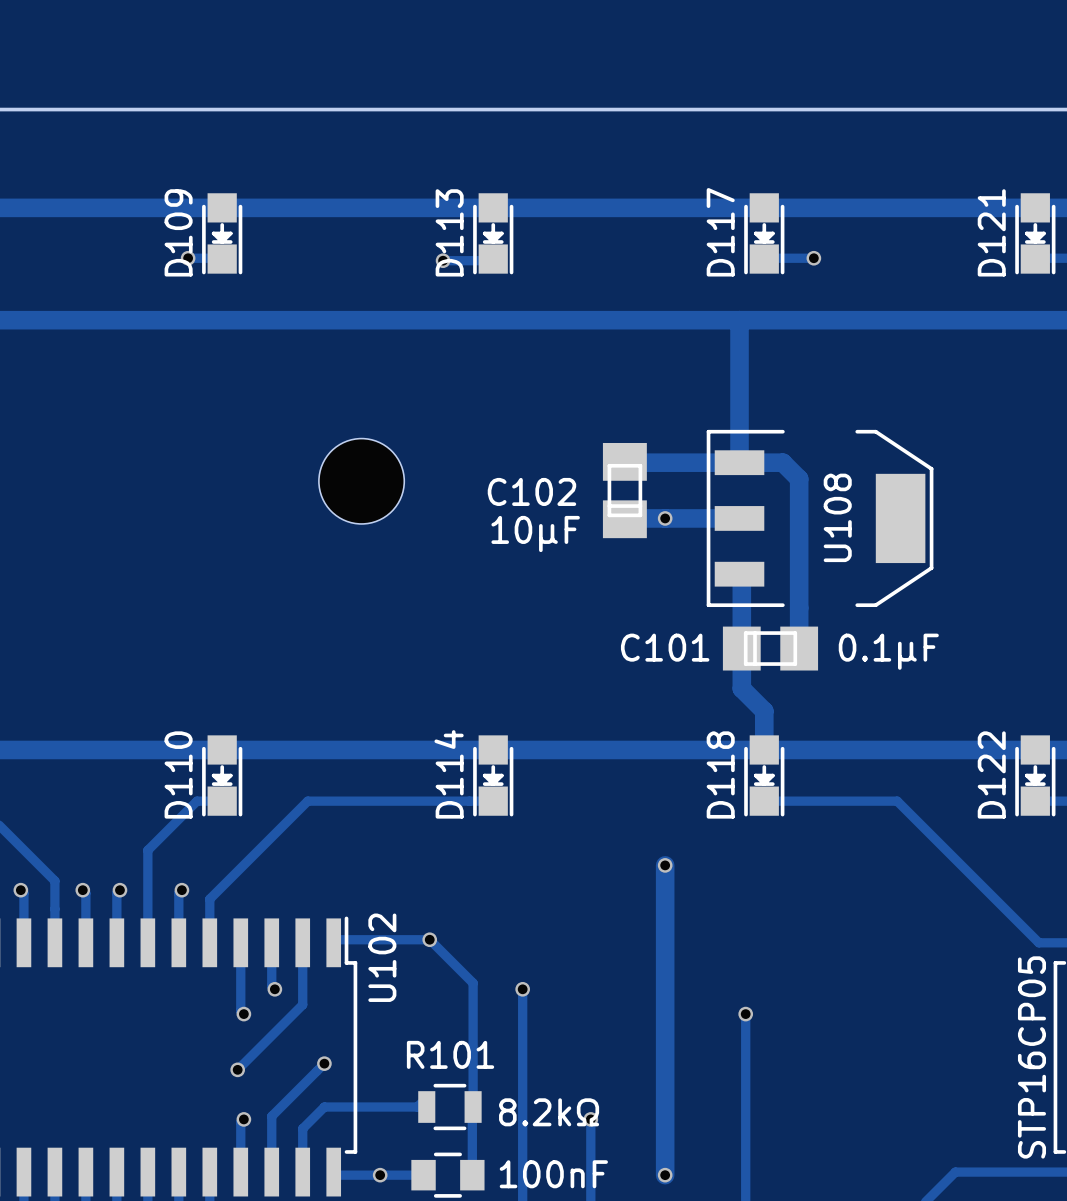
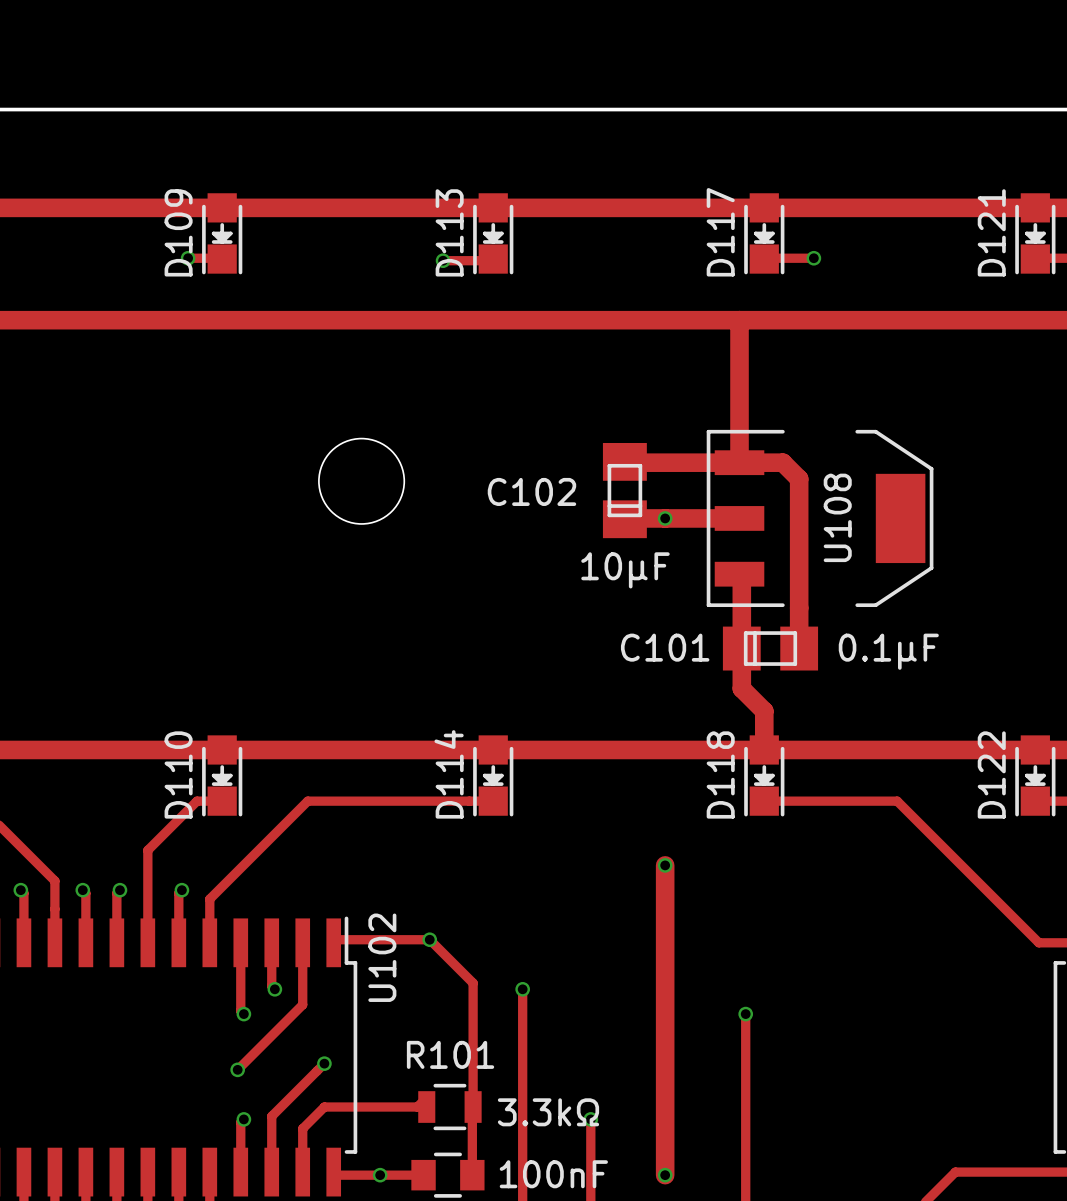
C102 value position: 10μF (535, 533) -> 10μF (625, 570)
part value: STP16CP05 (1031, 1057) -> none
R101 value: 8.2kΩ (549, 1112) -> 3.3kΩ (548, 1112)

